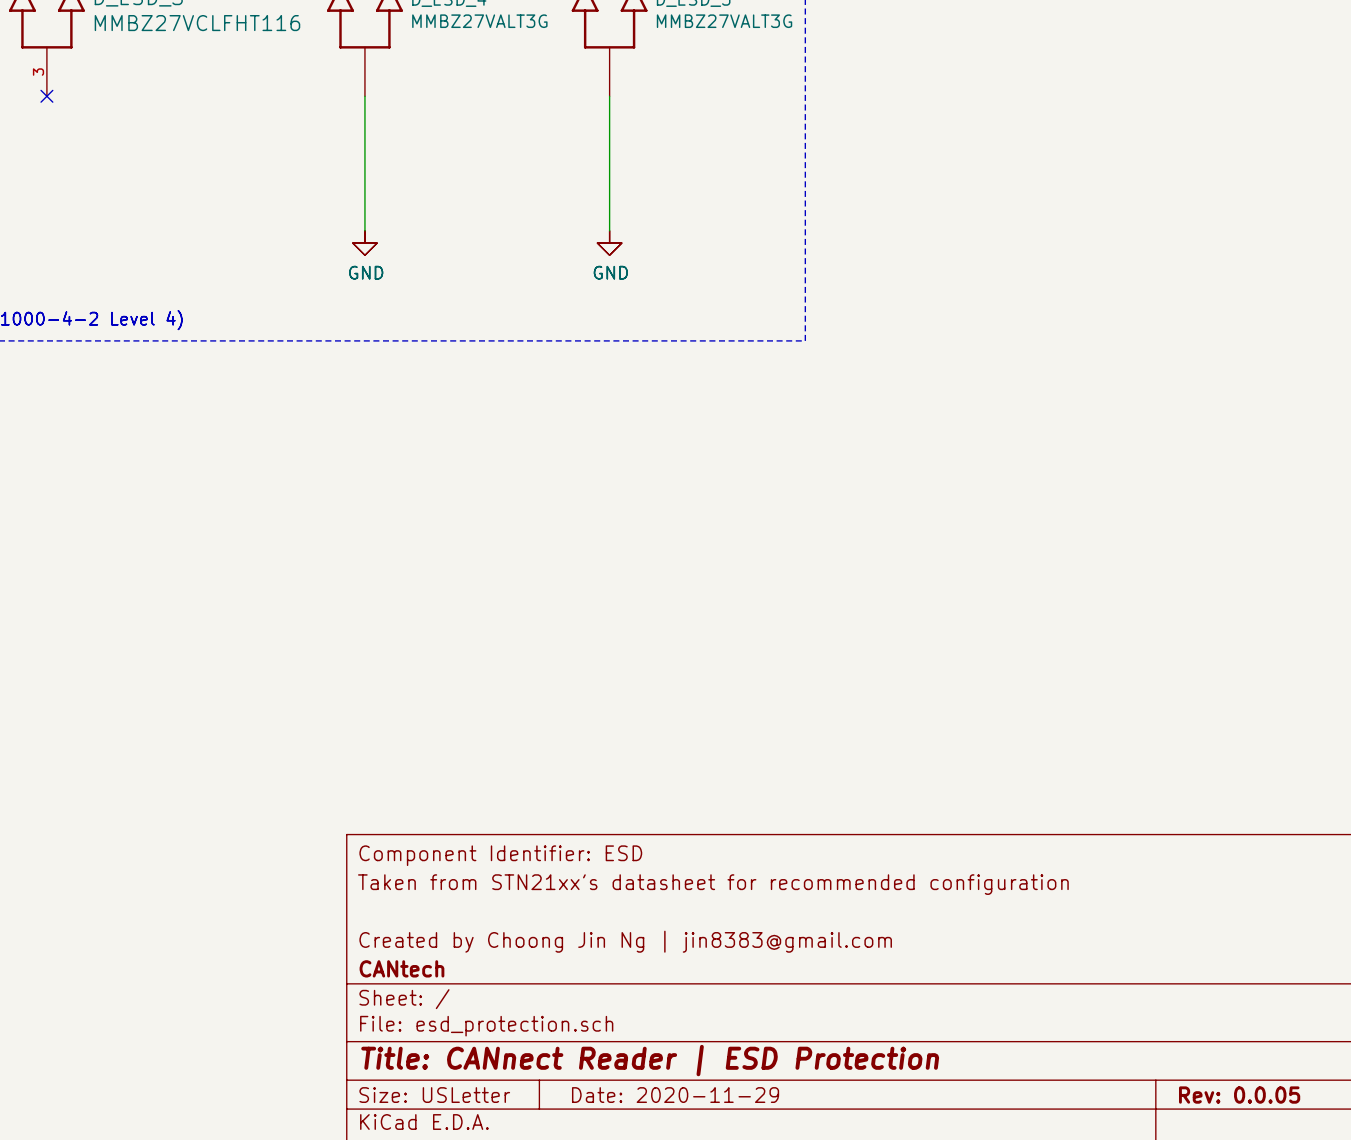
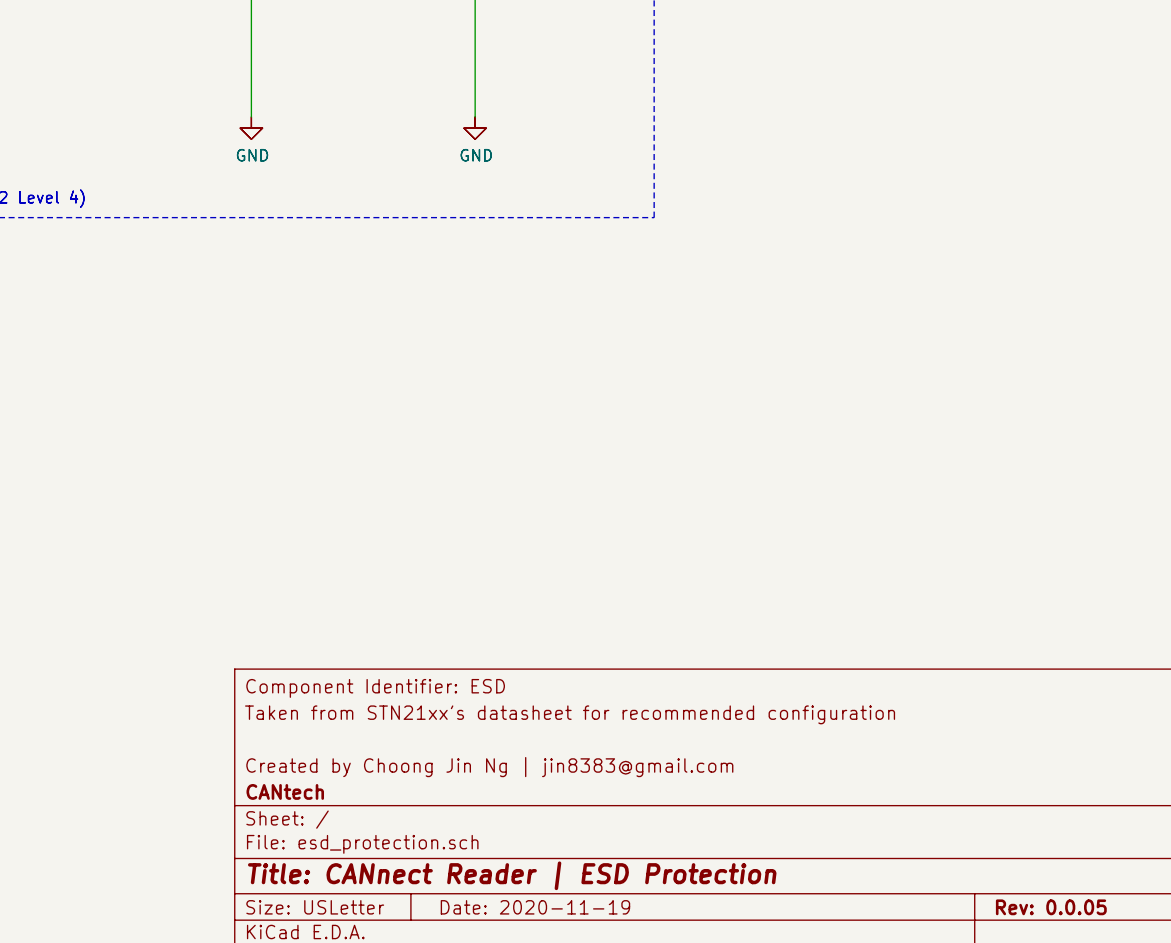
title block: Date: 2020-11-29 (675, 1095) -> Date: 2020-11-19 (535, 907)

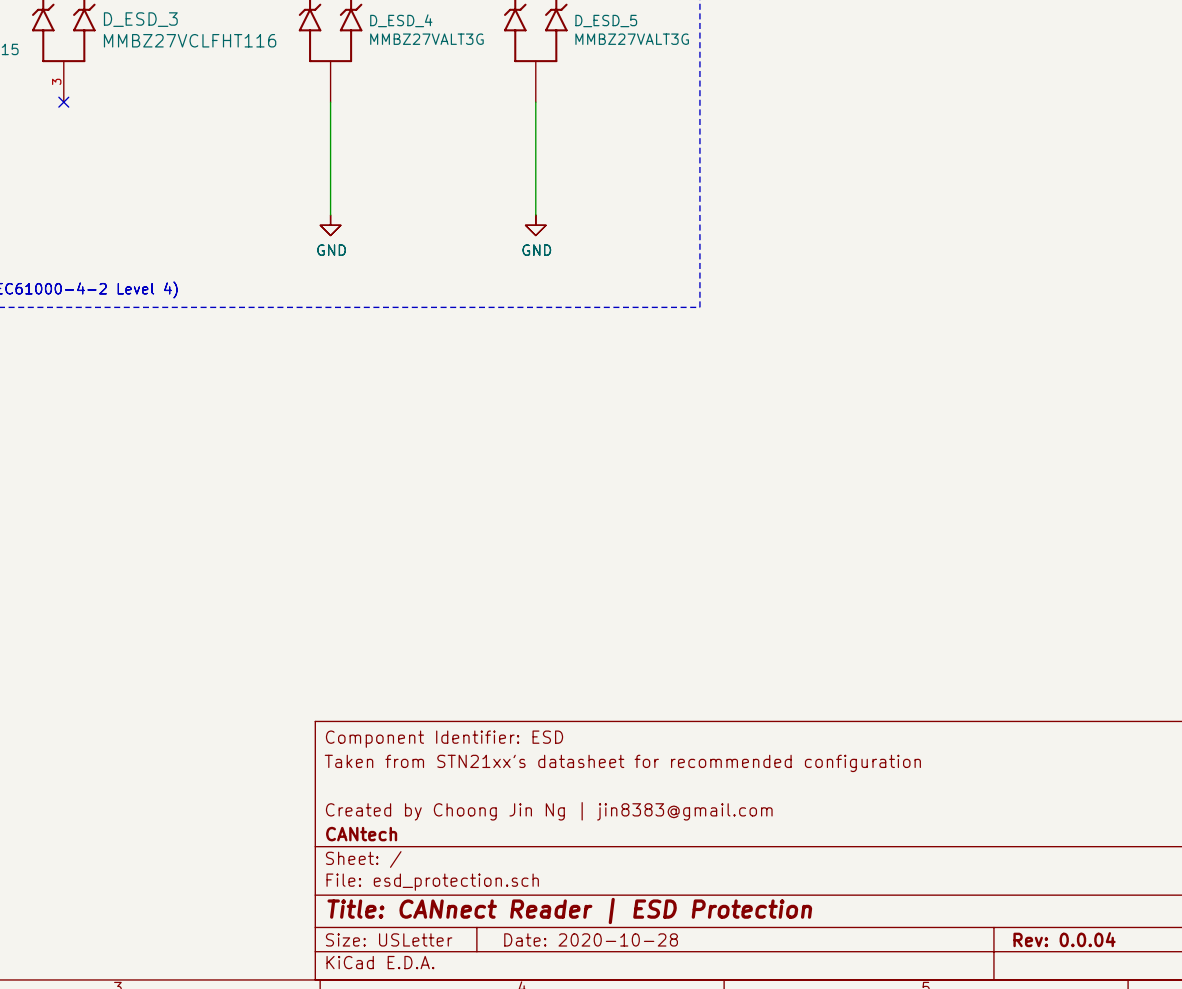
title block: Date: 2020-11-19 (535, 907) -> Date: 2020-10-28 (591, 939)
title block: Rev: 0.0.05 (1051, 907) -> Rev: 0.0.04 (1064, 939)

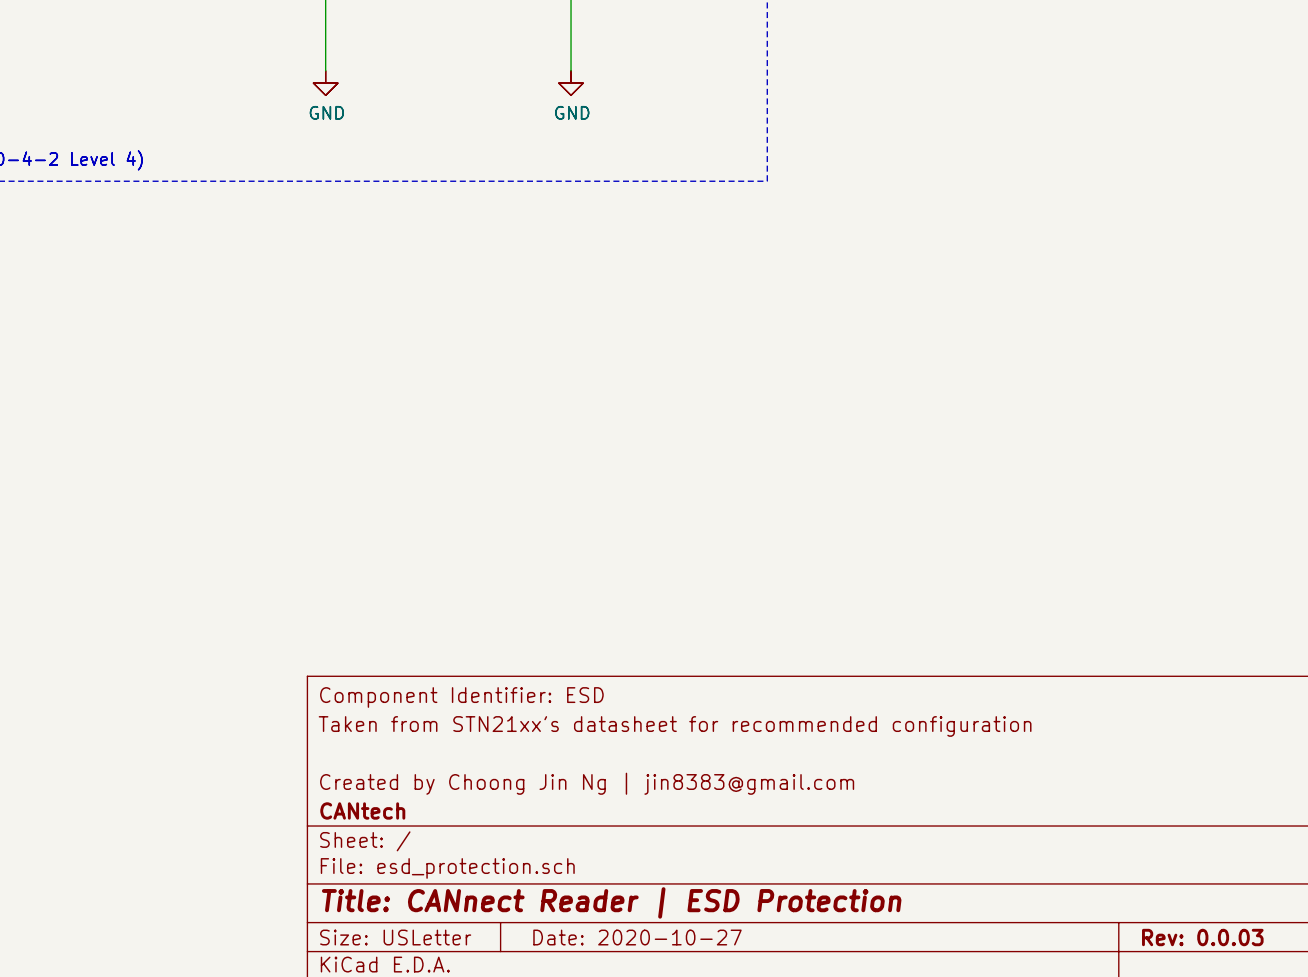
title block: Date: 2020-10-28 (591, 939) -> Date: 2020-10-27 (637, 937)
title block: Rev: 0.0.04 (1064, 939) -> Rev: 0.0.03 (1202, 937)

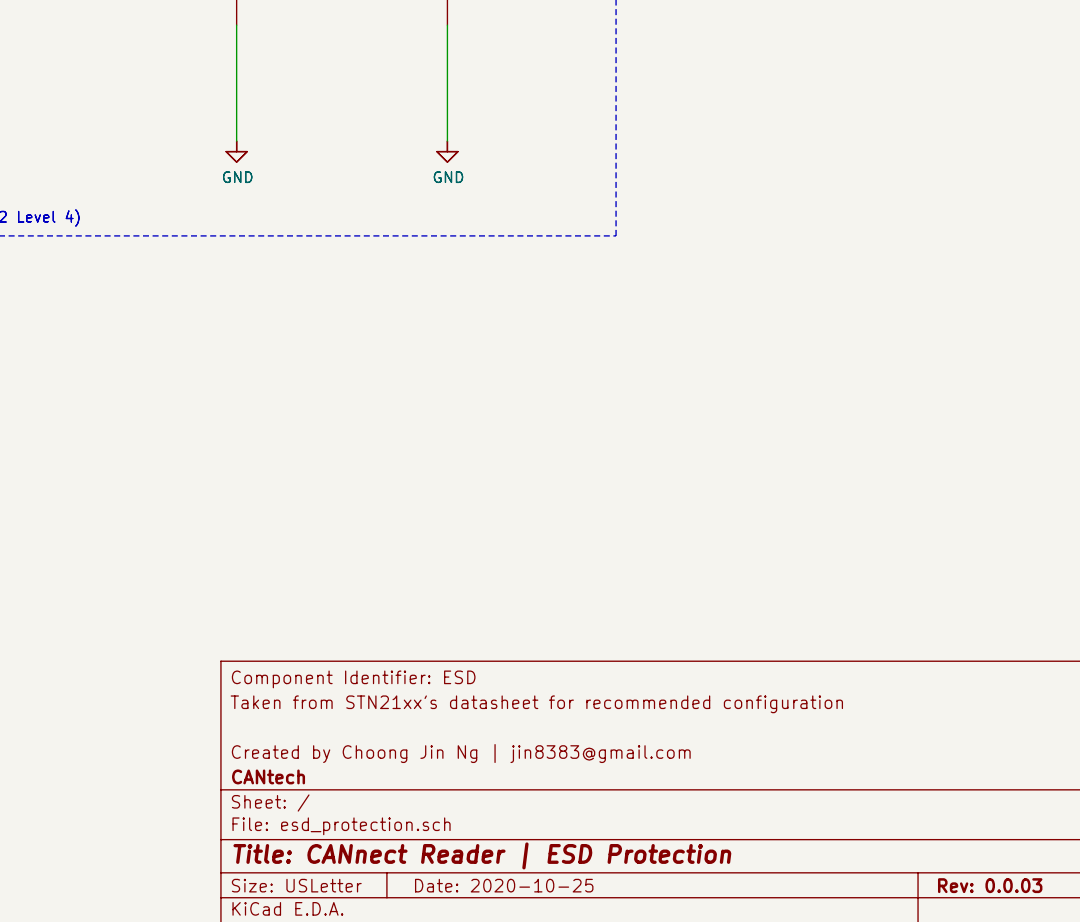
title block: Date: 2020-10-27 (637, 937) -> Date: 2020-10-25 (504, 885)

